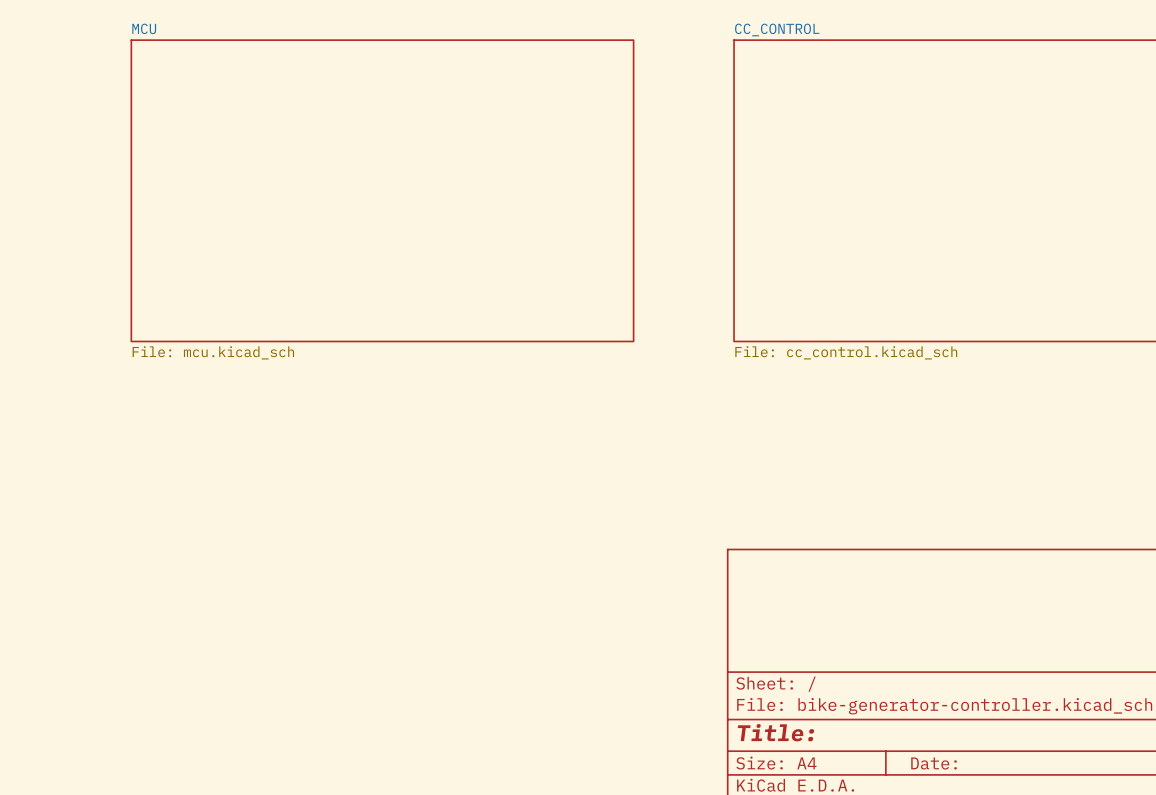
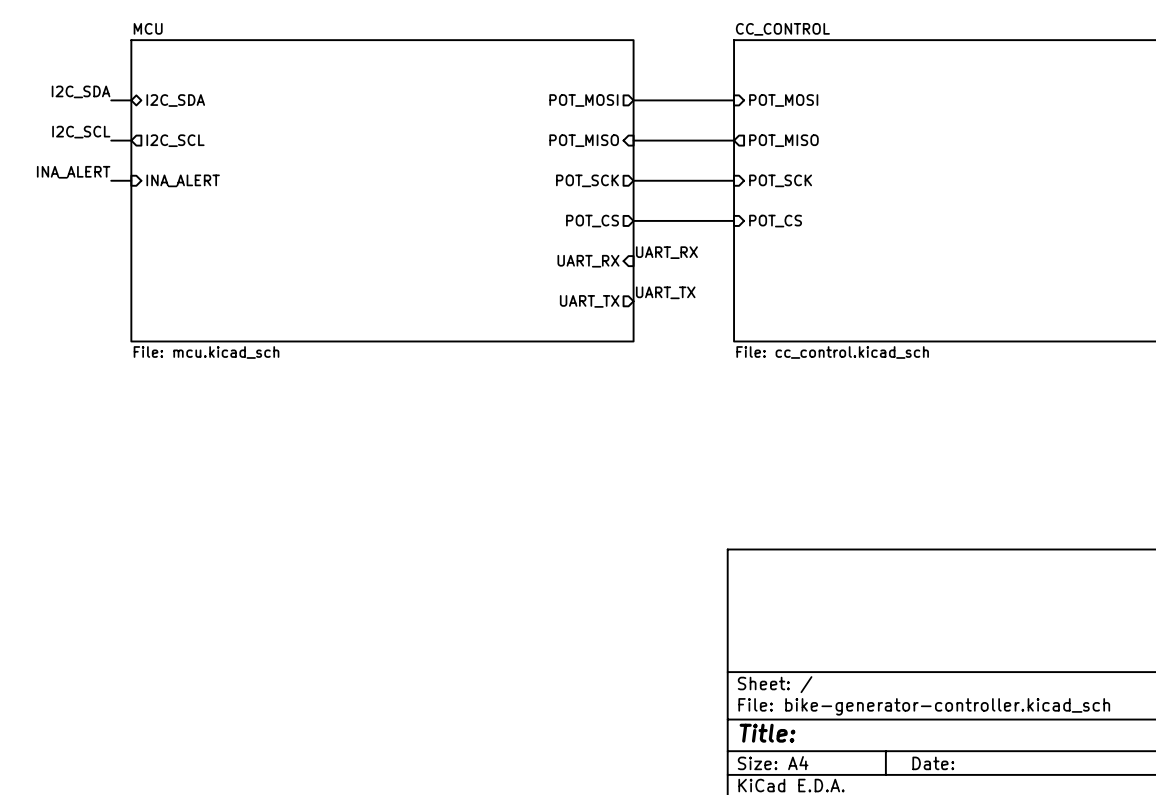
label: none -> I2C_SDA (81, 91)
wire: none -> (111, 100) (131, 100)
wire: none -> (633, 100) (734, 100)
sheet pin: none -> I2C_SDA (175, 100)
sheet pin: none -> POT_MOSI (583, 100)
sheet pin: none -> POT_MOSI (783, 100)
label: none -> I2C_SCL (81, 132)
wire: none -> (111, 140) (131, 140)
wire: none -> (633, 140) (734, 140)
sheet pin: none -> I2C_SCL (175, 140)
sheet pin: none -> POT_MISO (584, 140)
sheet pin: none -> POT_MISO (783, 140)
label: none -> INA_ALERT (73, 172)
wire: none -> (111, 180) (131, 180)
wire: none -> (633, 180) (734, 180)
sheet pin: none -> INA_ALERT (183, 180)
sheet pin: none -> POT_SCK (587, 180)
sheet pin: none -> POT_SCK (780, 180)
wire: none -> (633, 220) (734, 220)
sheet pin: none -> POT_CS (592, 221)
sheet pin: none -> POT_CS (775, 221)
label: none -> UART_RX (666, 252)
sheet pin: none -> UART_RX (588, 261)
label: none -> UART_TX (665, 292)
sheet pin: none -> UART_TX (589, 301)

